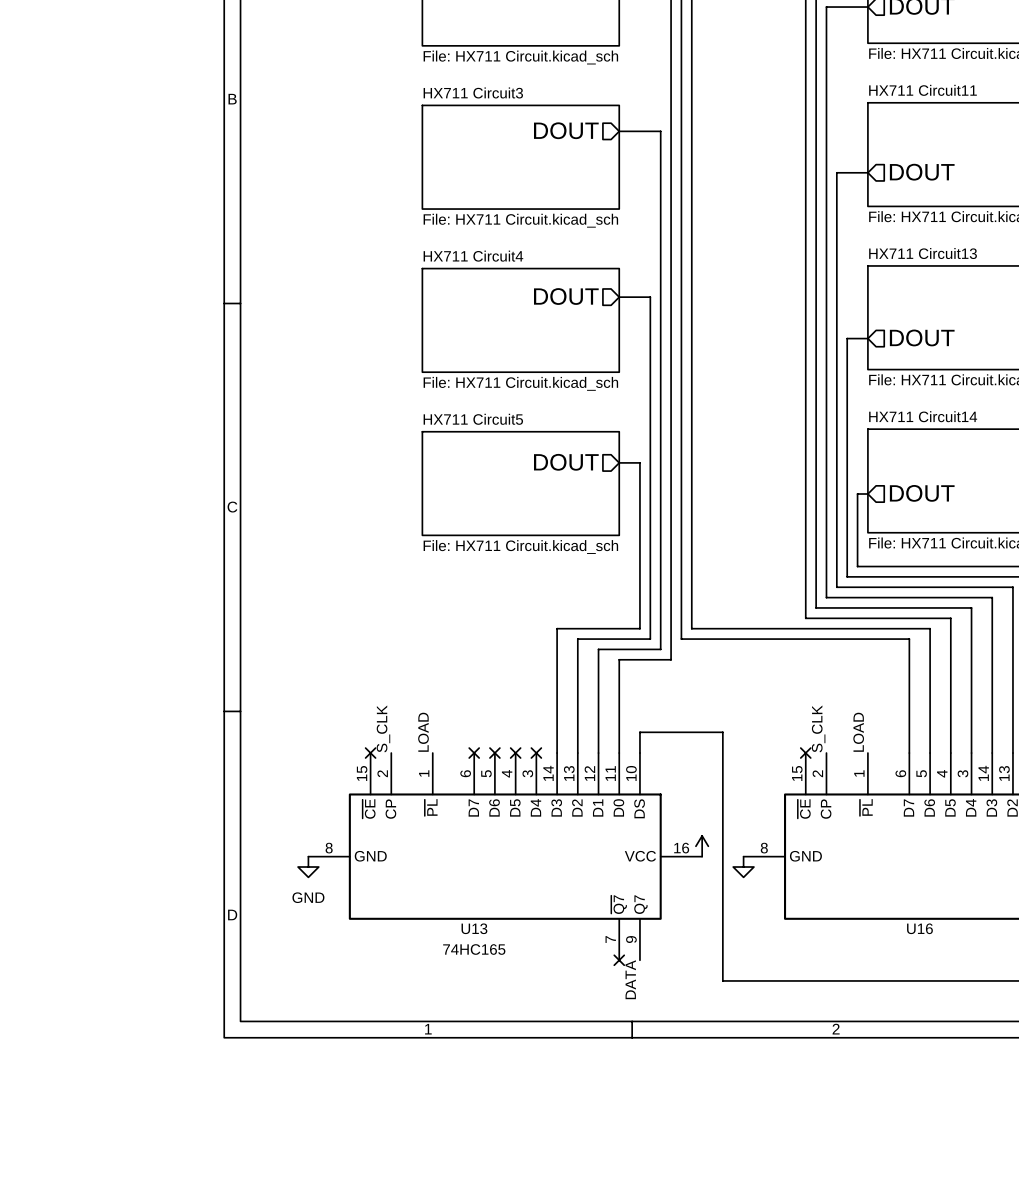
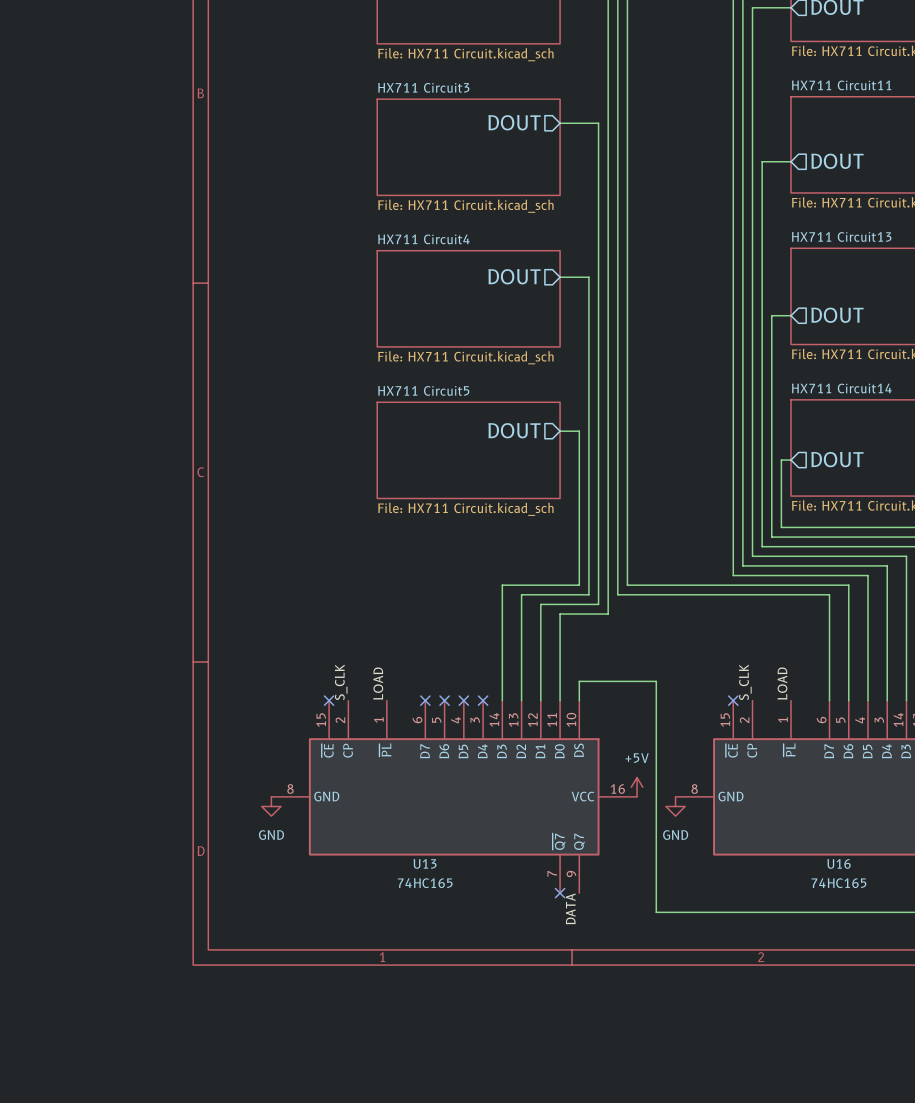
power symbol text: none -> +5V (637, 758)
power symbol text: none -> GND (675, 835)
U16 value: none -> 74HC165 (838, 883)

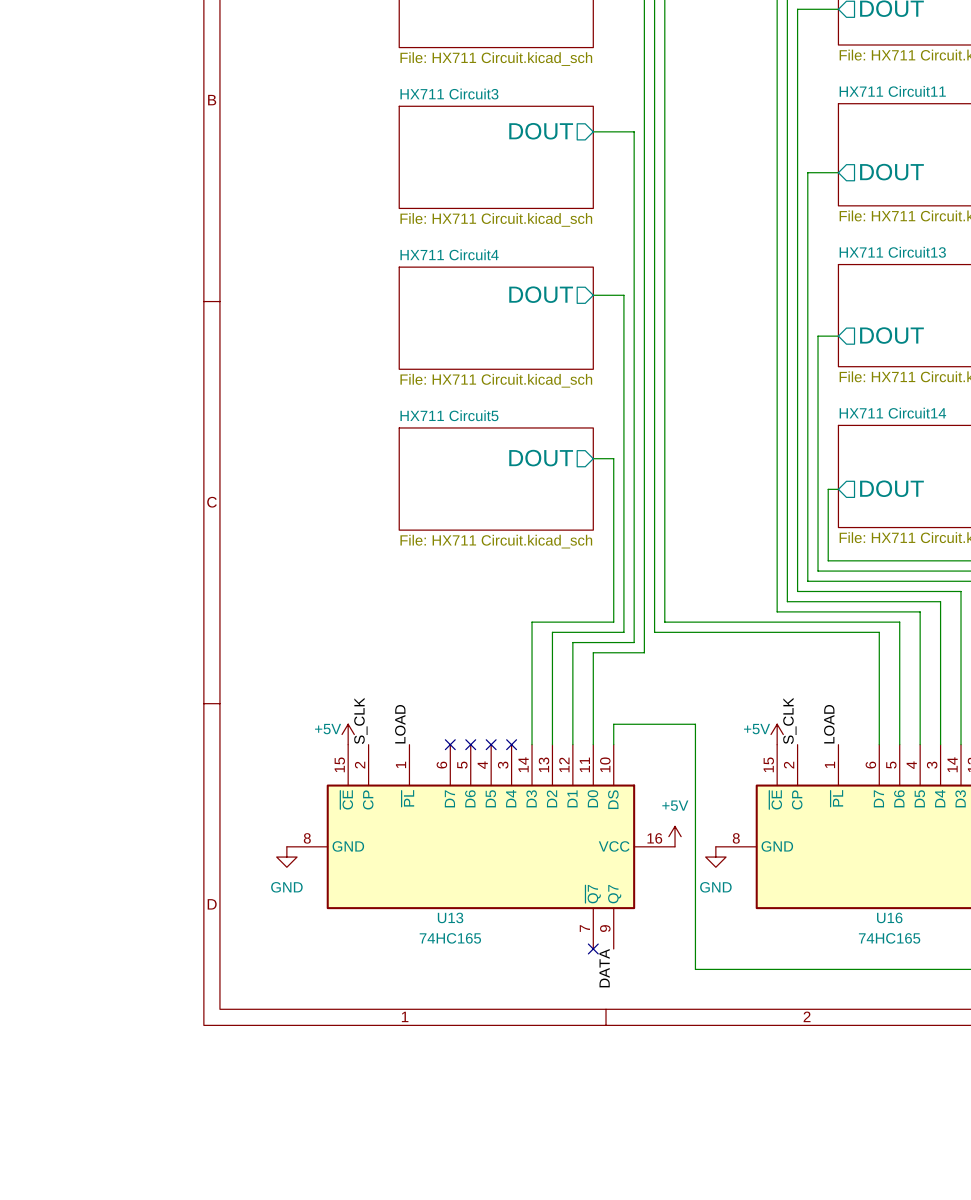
power symbol: none -> +5V (348, 734)
power symbol: none -> +5V (777, 734)
no-connect mark: (329, 700) -> none
no-connect mark: (733, 700) -> none

